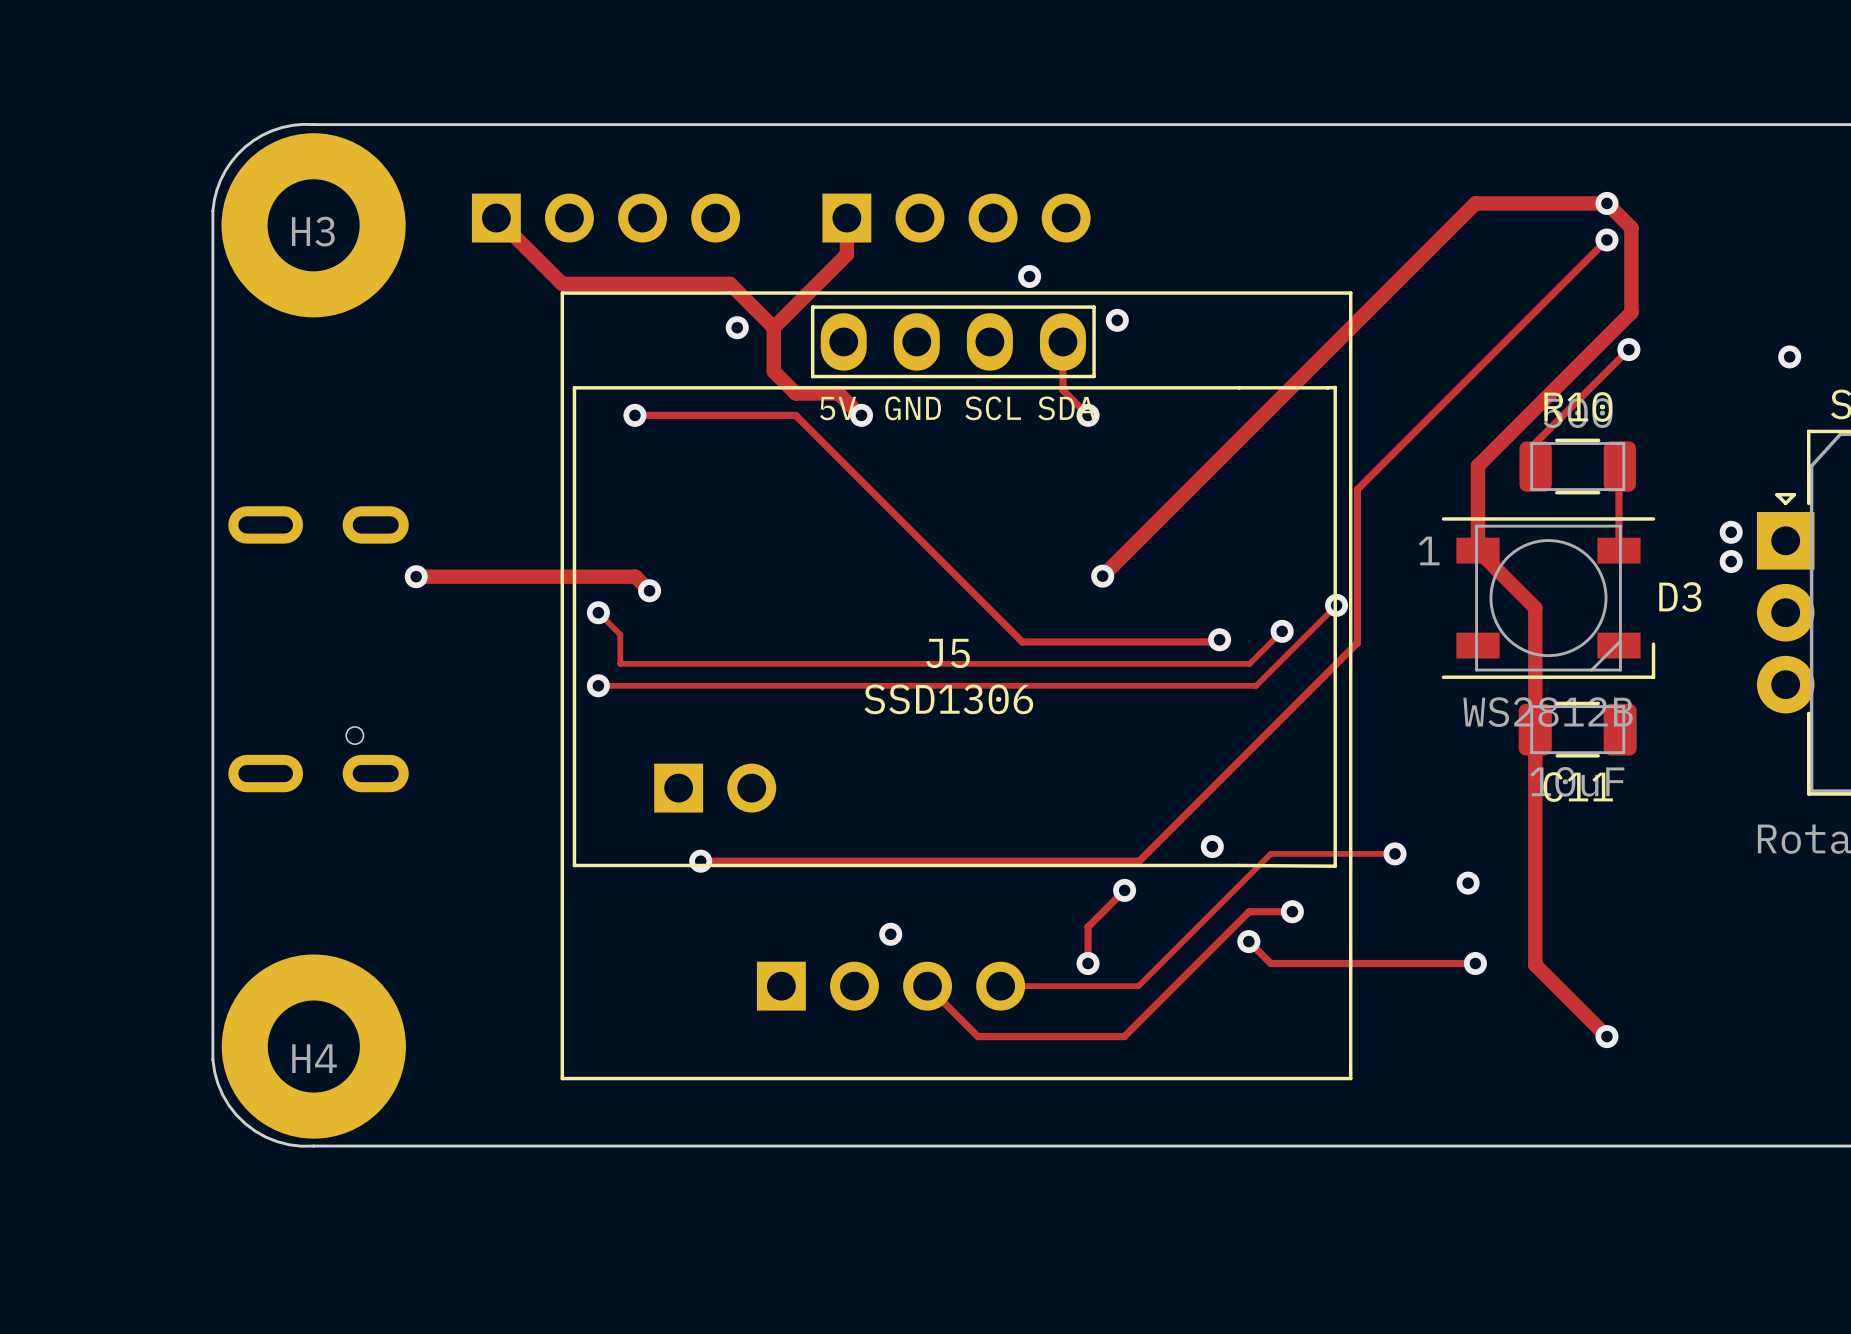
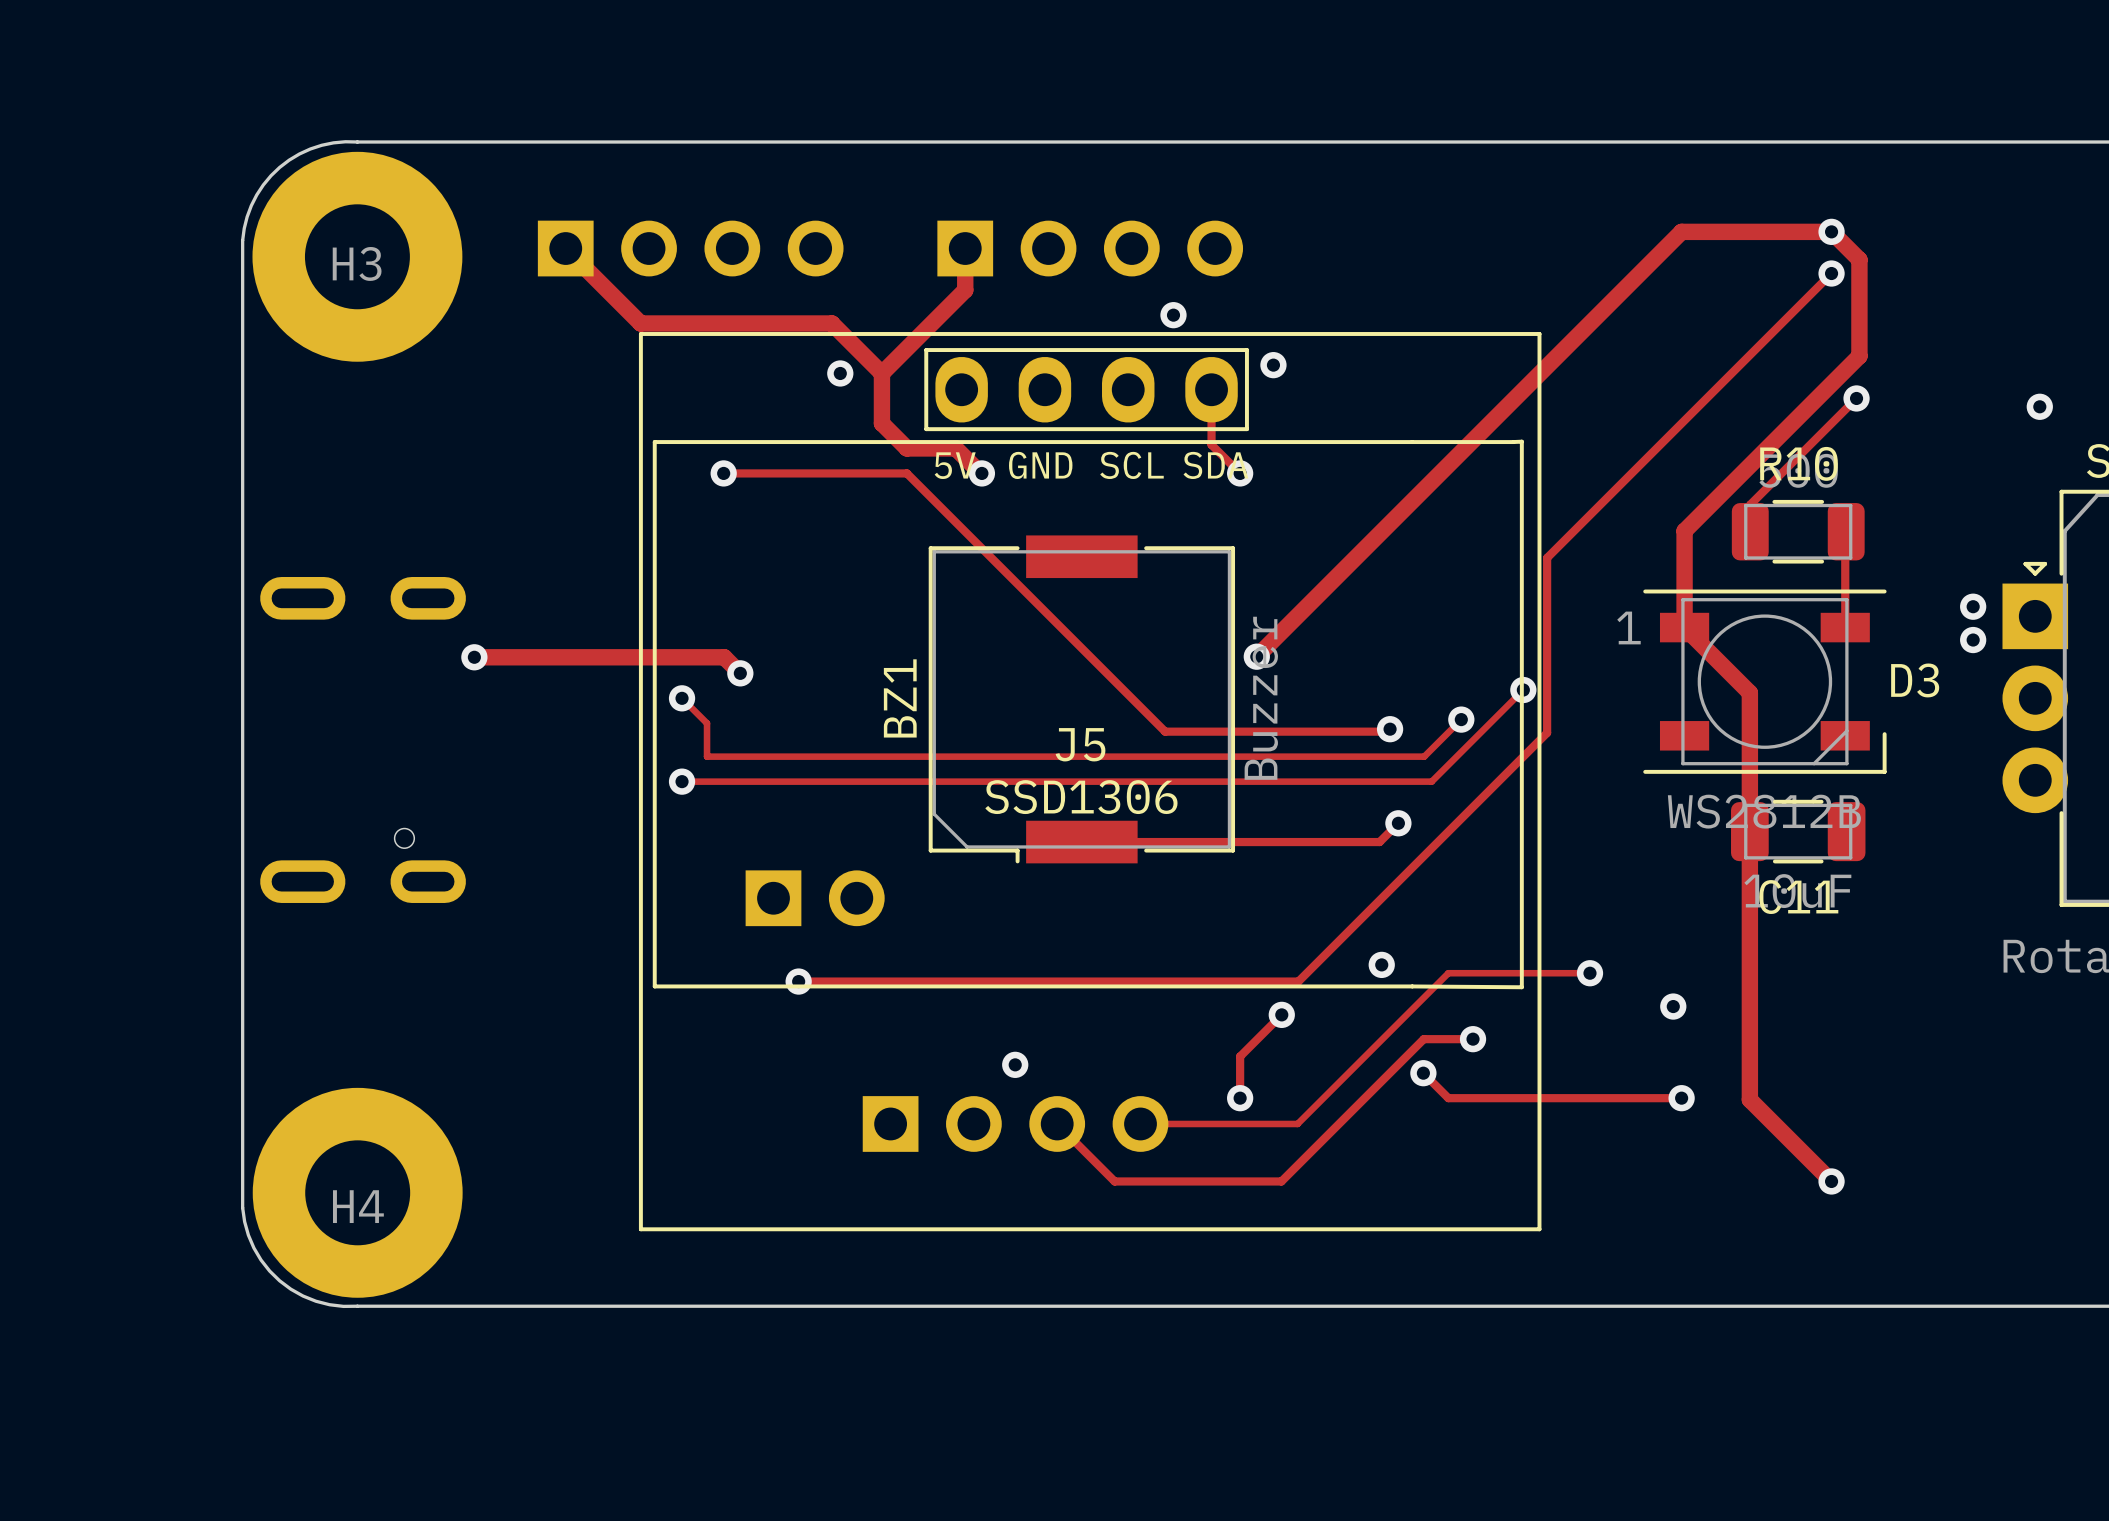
BZ1: none -> Buzzer (1081, 699)
track: none -> (1398, 823) (1379, 842) (1081, 842)
via: none -> (1398, 823)

